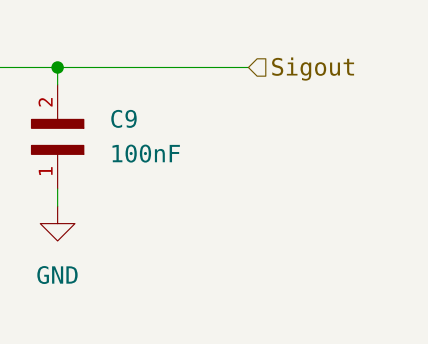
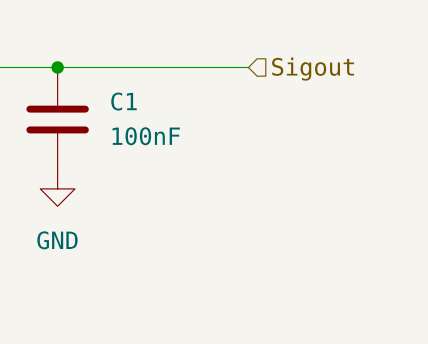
C1: none -> 100nF (57, 119)
C9: 100nF (57, 136) -> none
wire: (57, 188) (57, 206) -> none
power symbol position: GND (57, 223) -> GND (57, 188)

